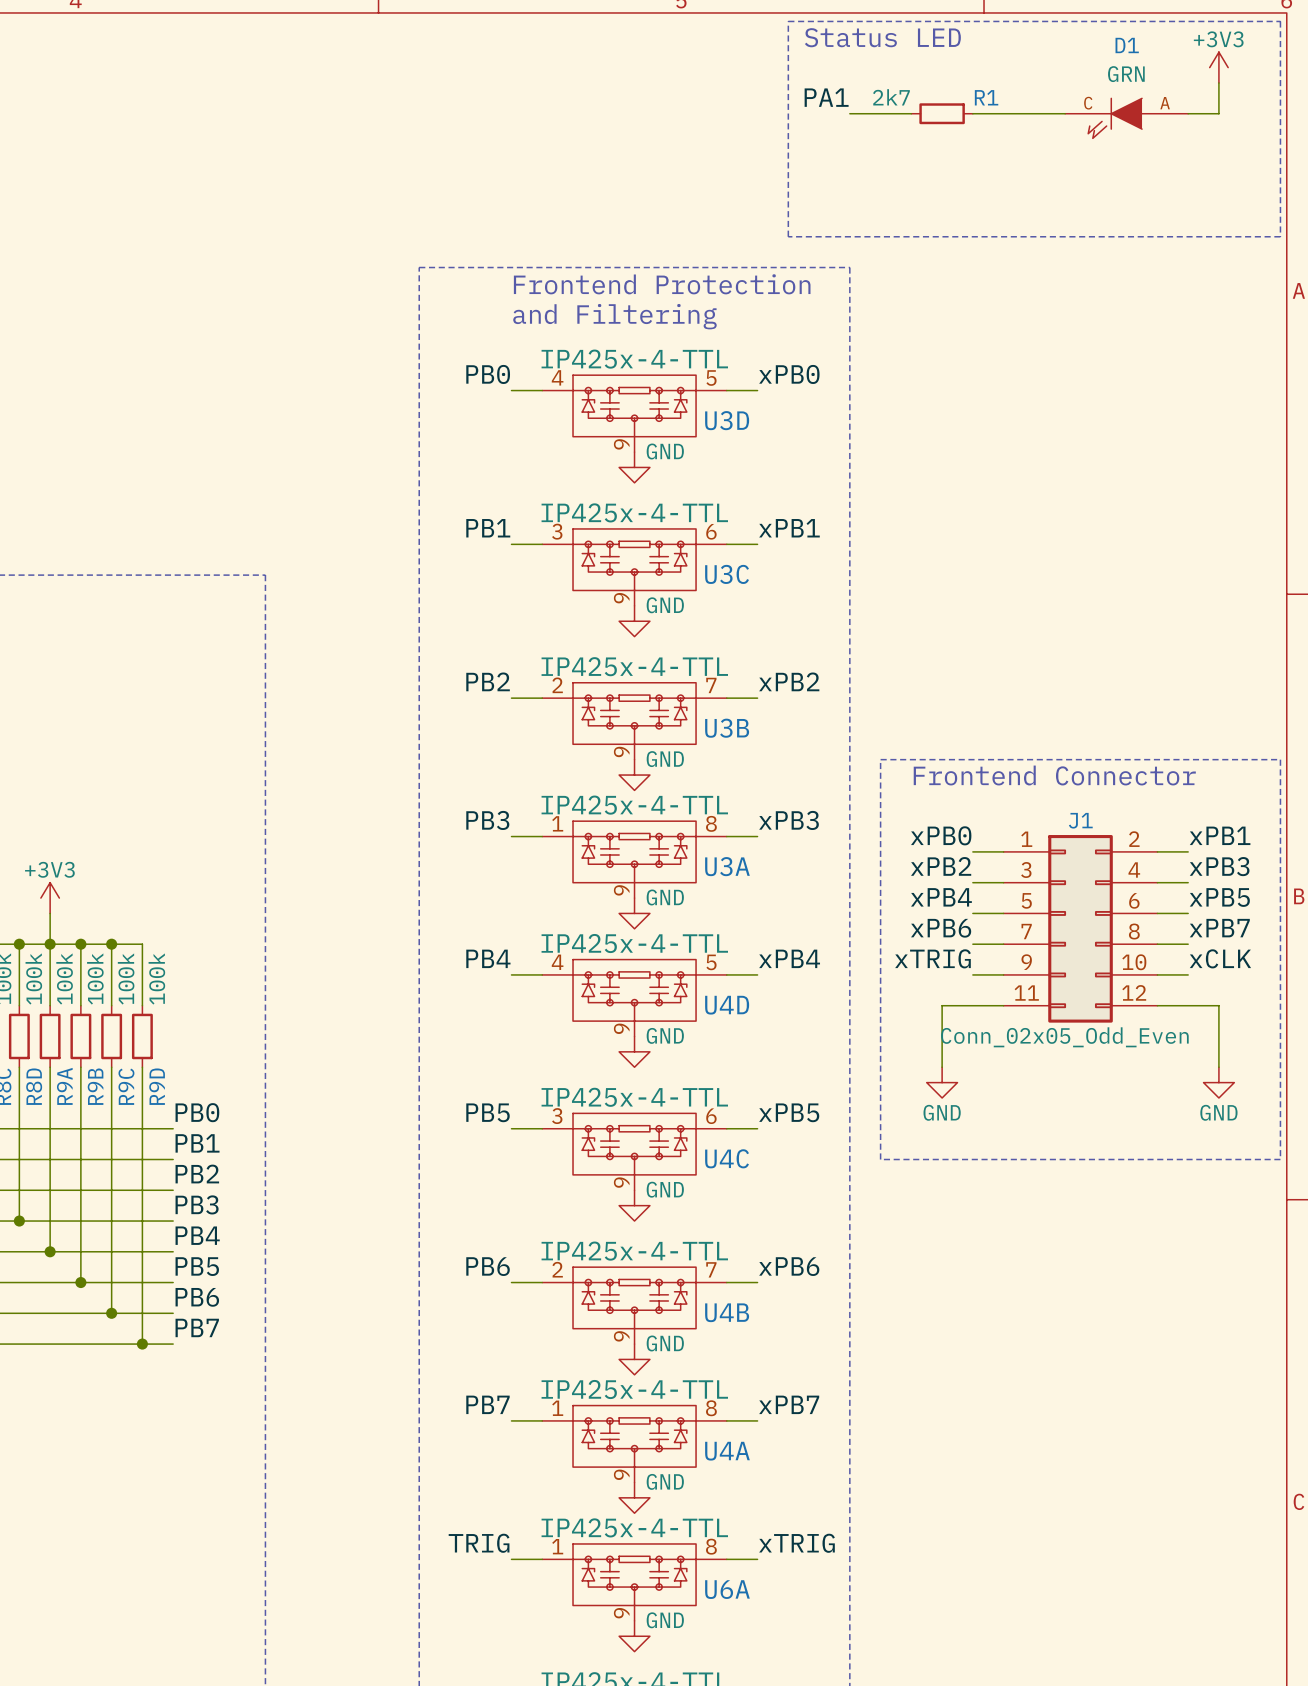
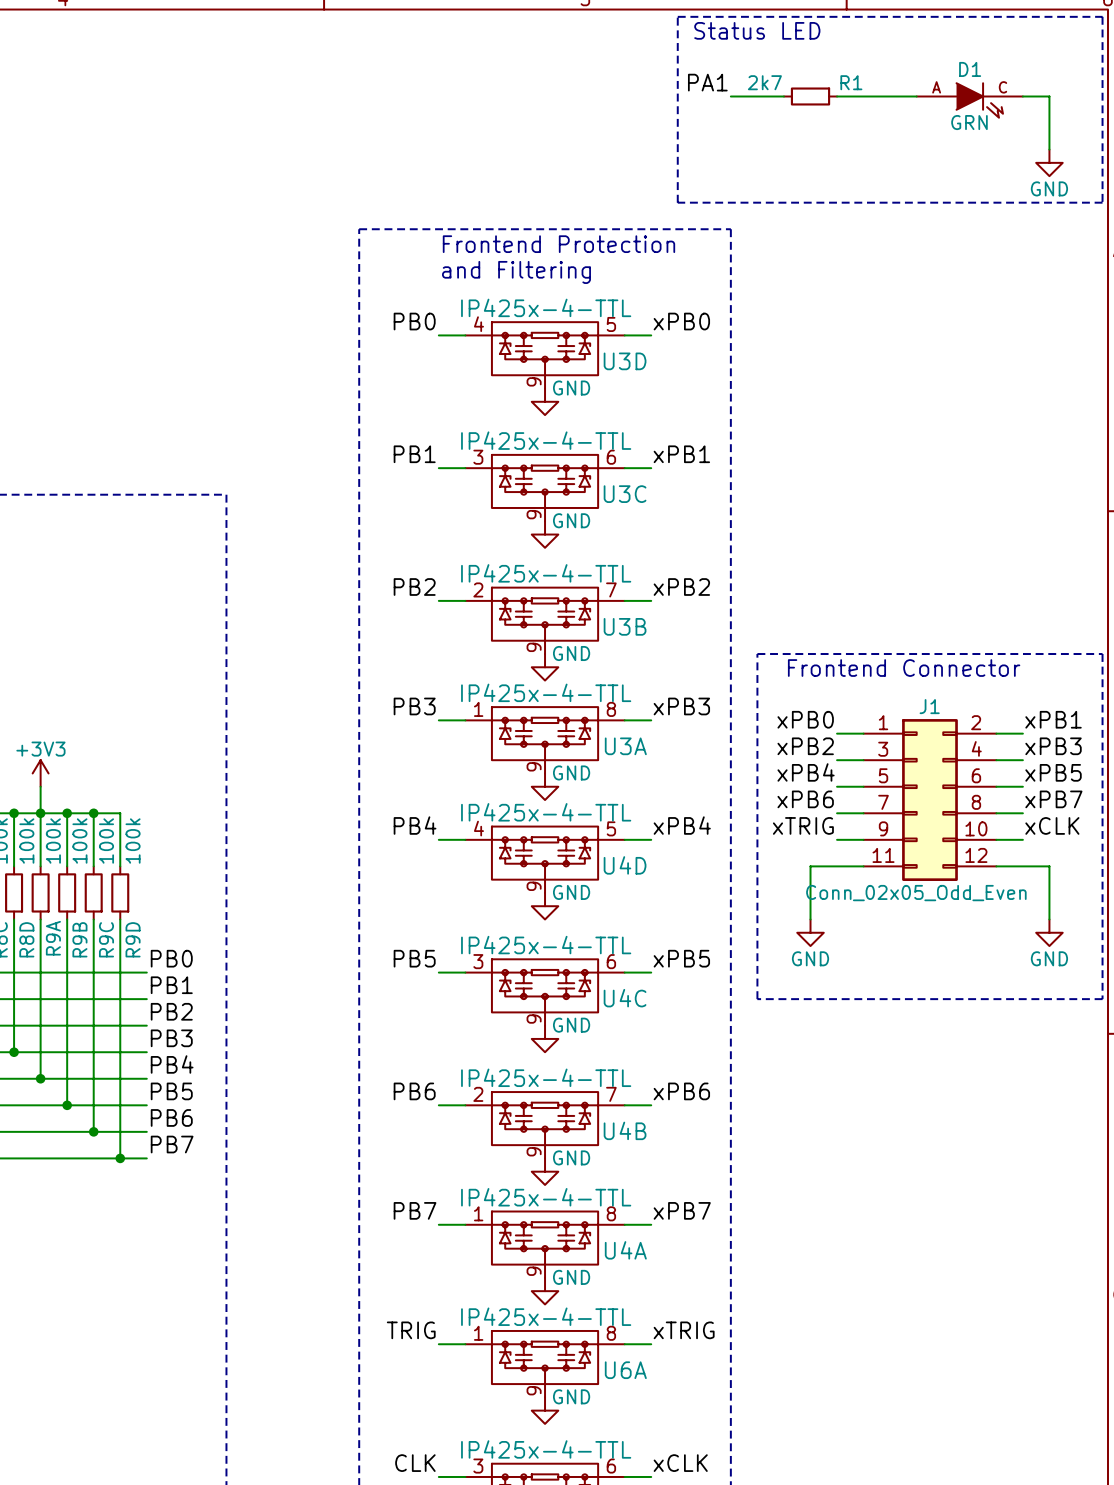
D1 name position: D1 (1127, 45) -> D1 (970, 69)
power symbol: +3V3 (1218, 67) -> none
D1 value position: GRN (1126, 74) -> GRN (969, 122)
wire: (1218, 82) (1218, 113) -> (1049, 149) (1049, 96)
D1 flip: as is (1115, 118) -> left-right (979, 100)
power symbol: none -> GND (1049, 162)

